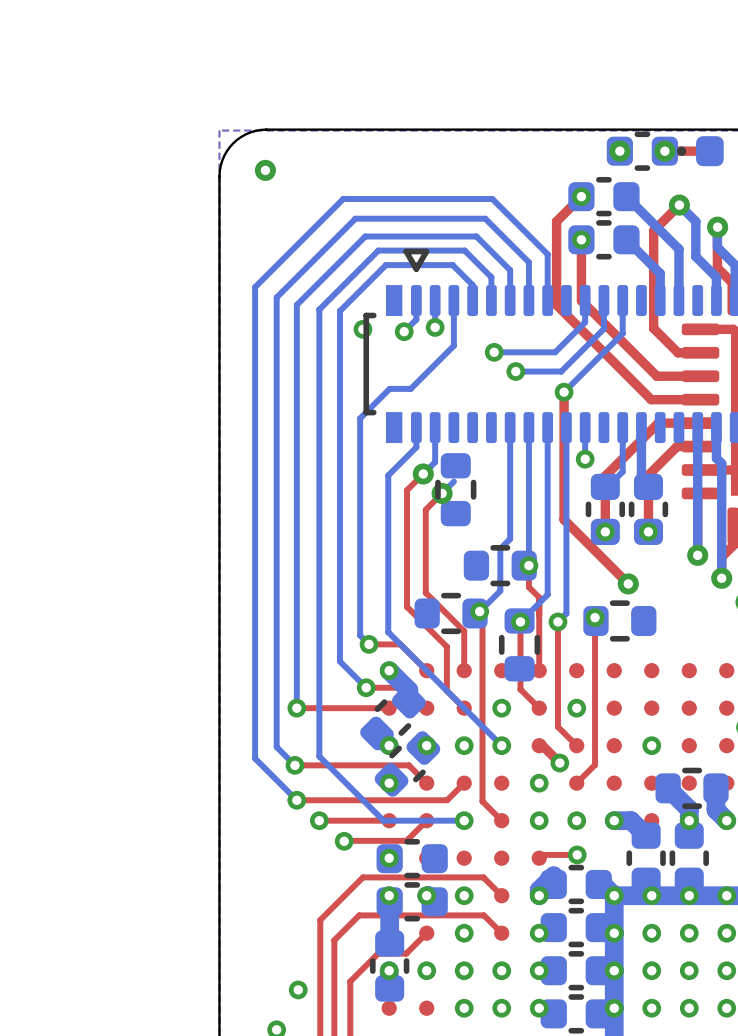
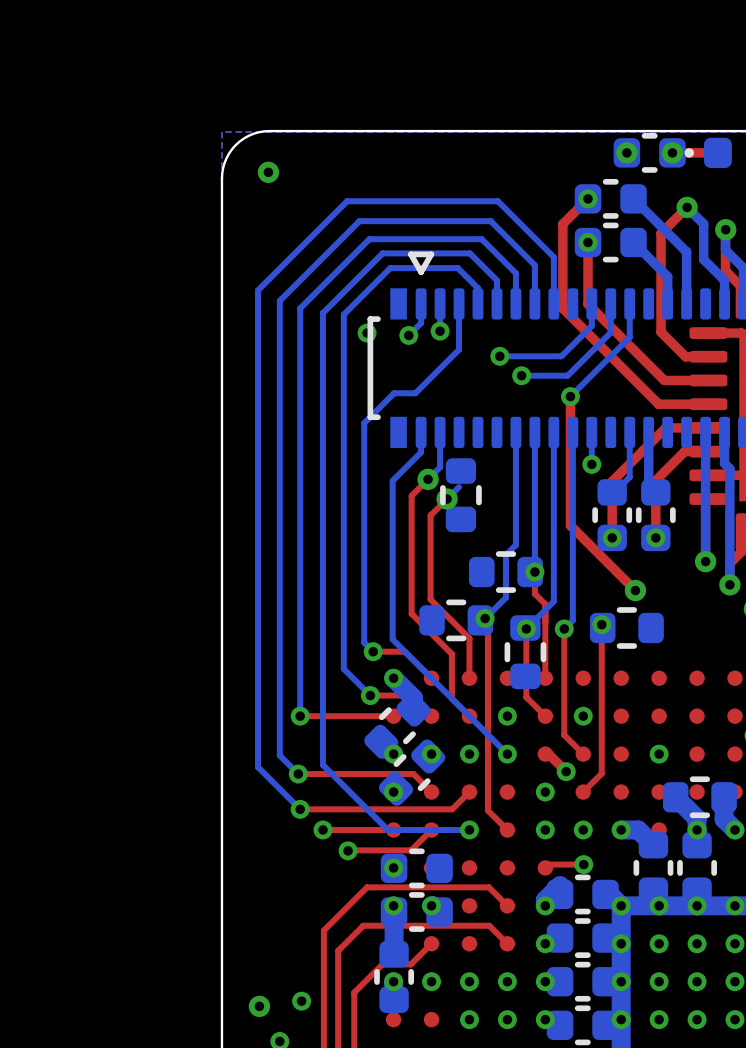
via: (464, 895) -> none
via: (464, 933) -> none
via: none -> (259, 1006)

